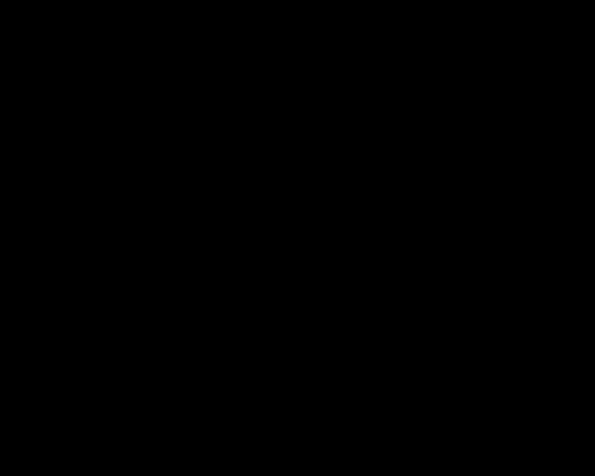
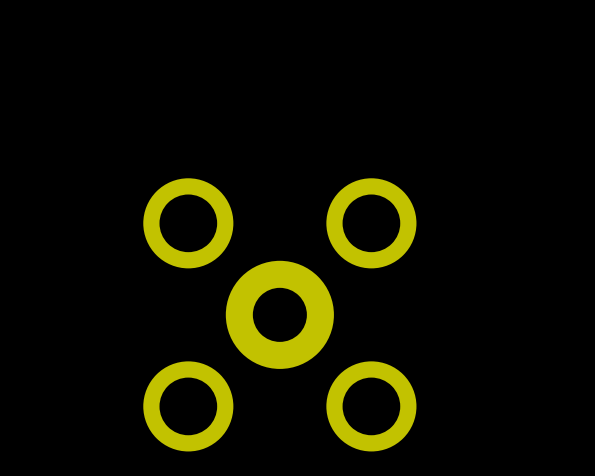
part: none -> (279, 314)

